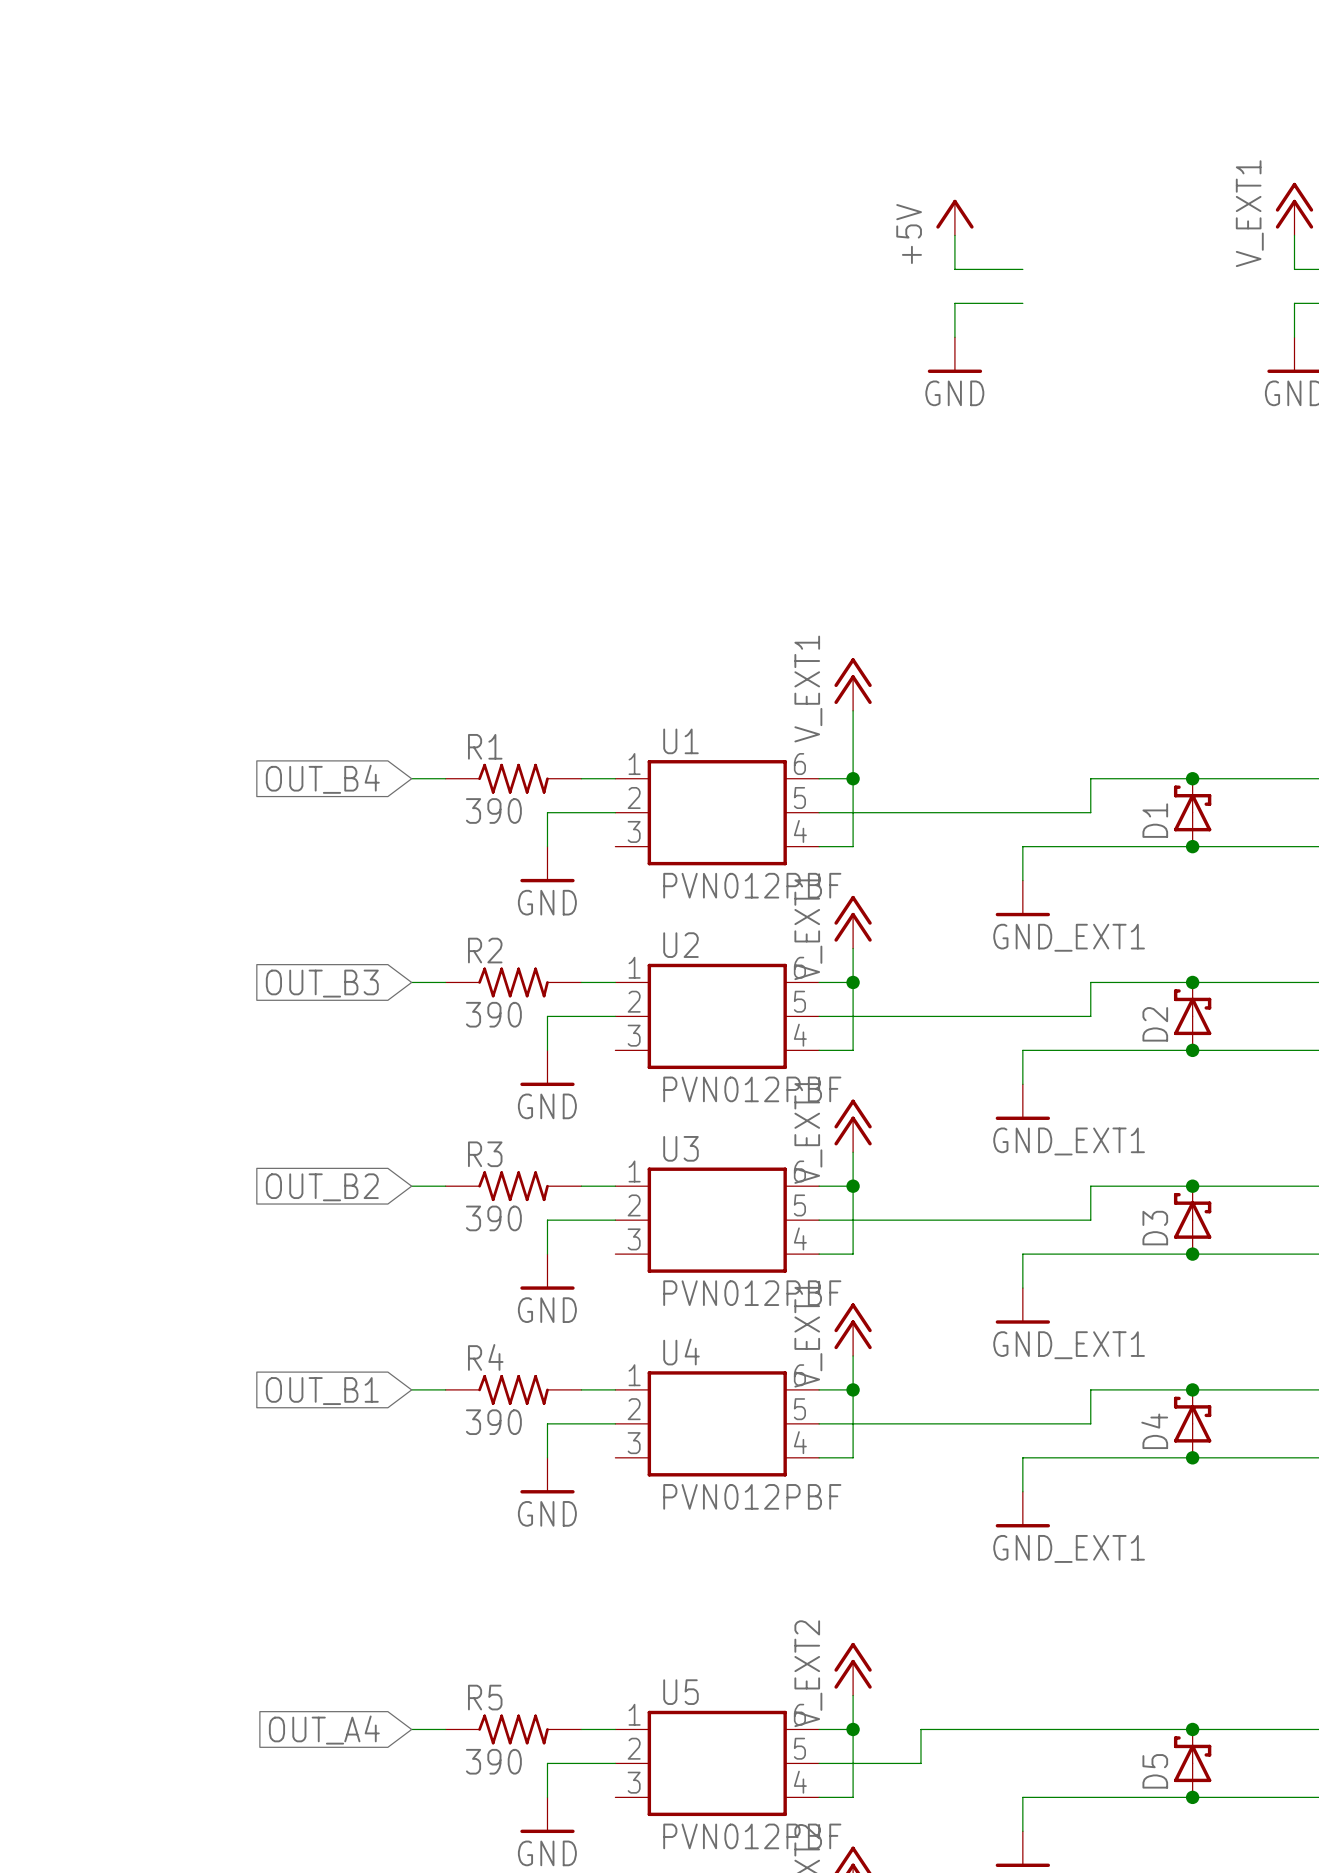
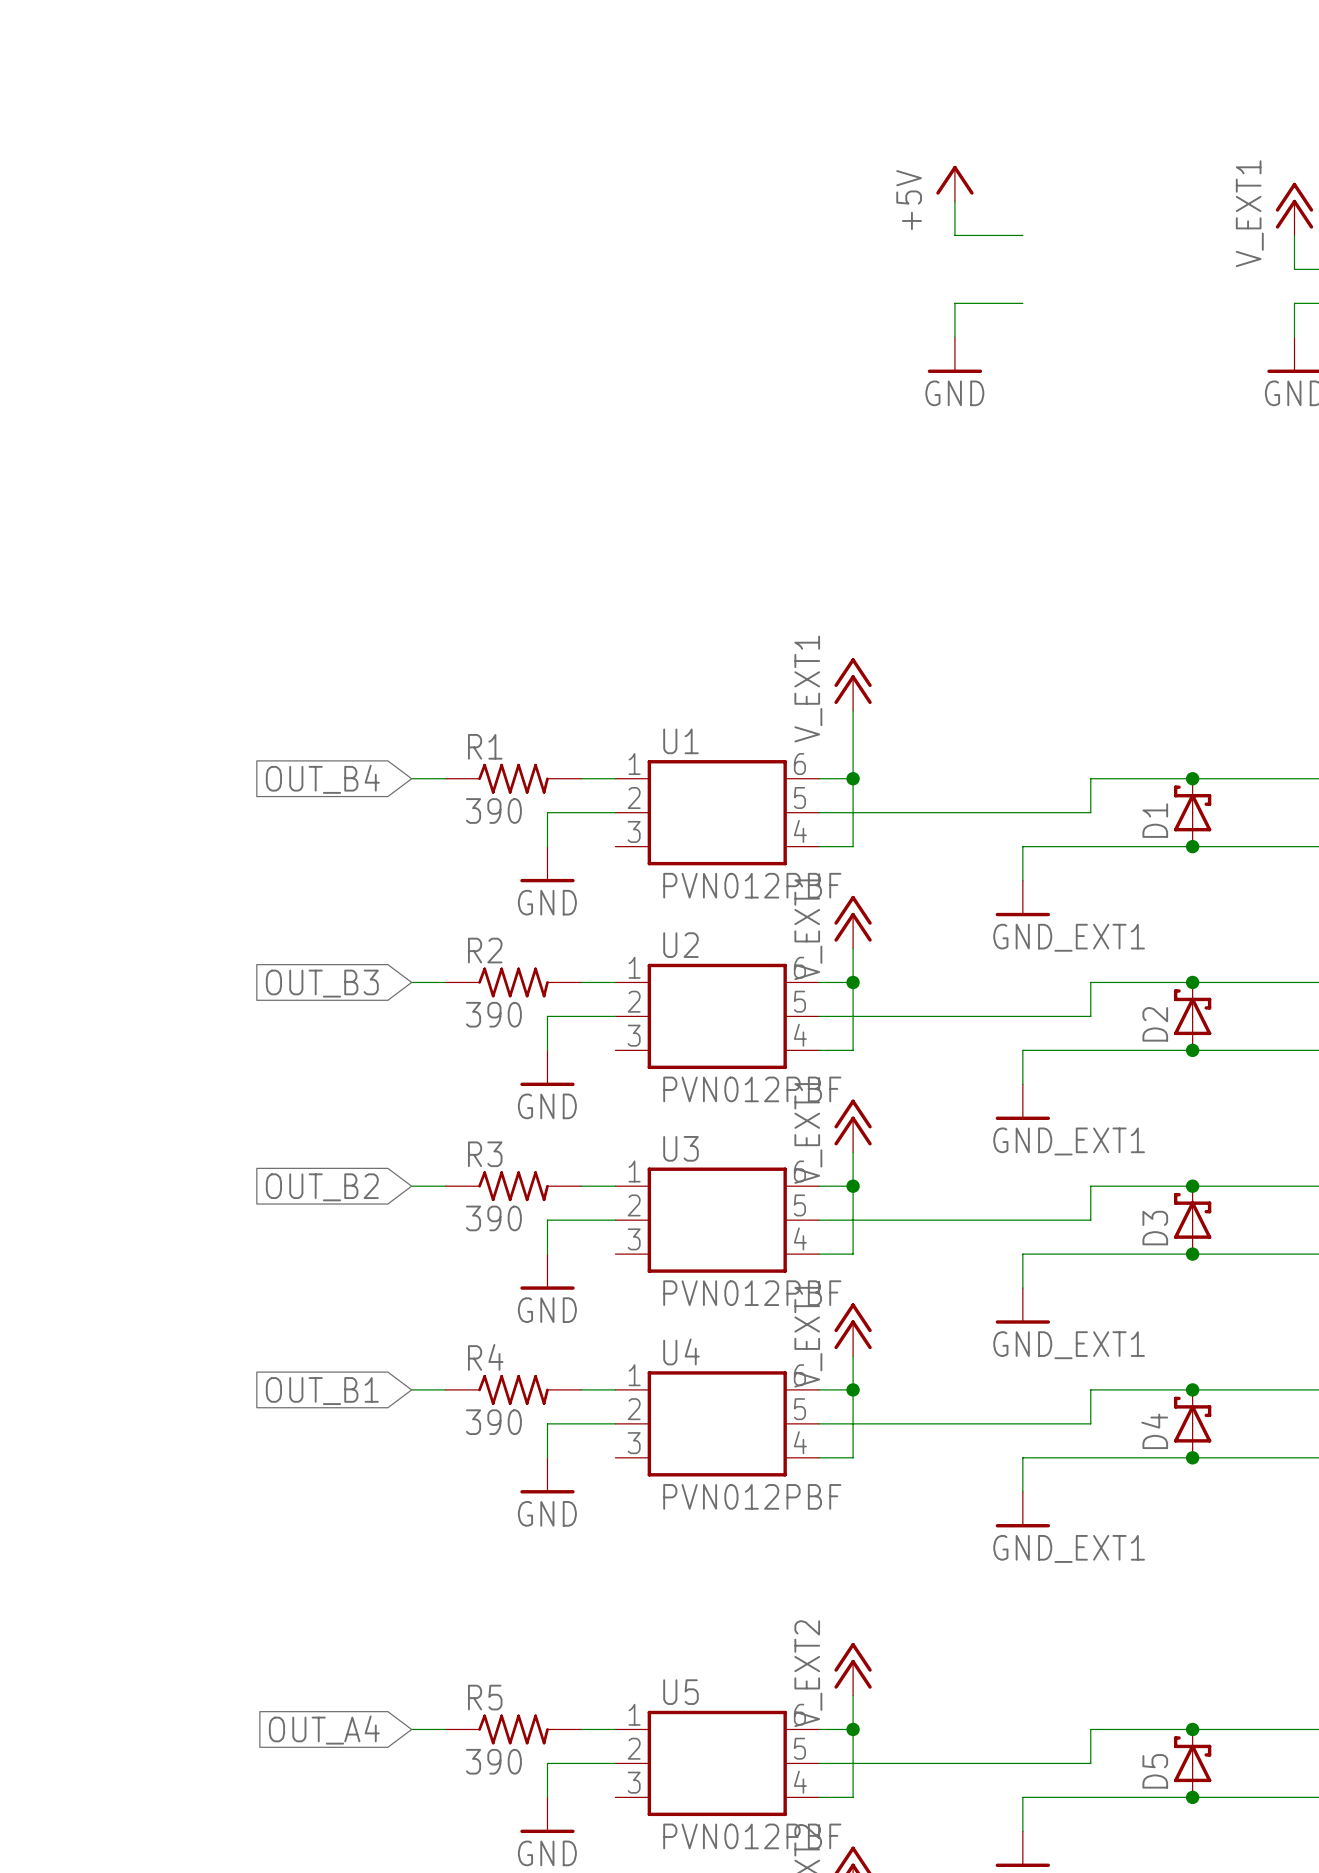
power symbol position: +5V (954, 217) -> +5V (954, 183)
wire: (954, 235) (954, 269) (1022, 269) -> (954, 201) (954, 235) (1022, 235)
wire: (1090, 1729) (920, 1729) (920, 1763) -> (1090, 1729) (1090, 1763) (920, 1763)

